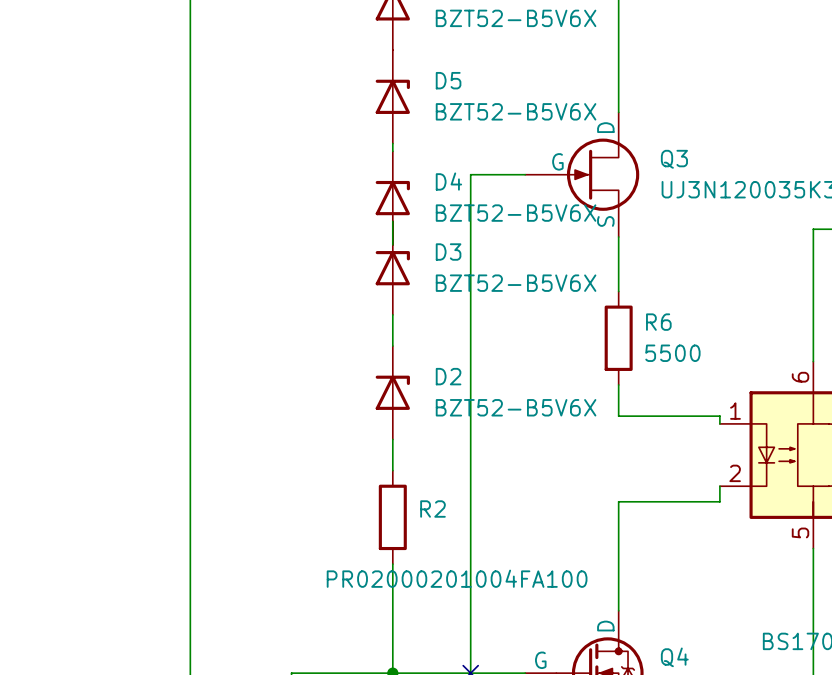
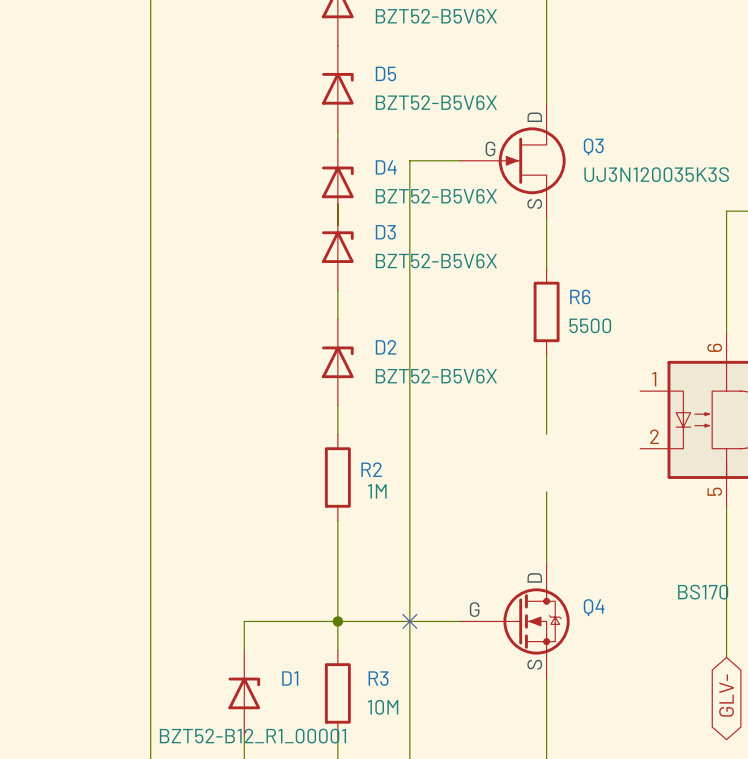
wire: (618, 416) (719, 416) (719, 423) -> (546, 383) (546, 434)
wire: (719, 486) (719, 501) (618, 501) (618, 532) -> none
R2 value: PR02000201004FA100 (457, 578) -> 1M (377, 491)

